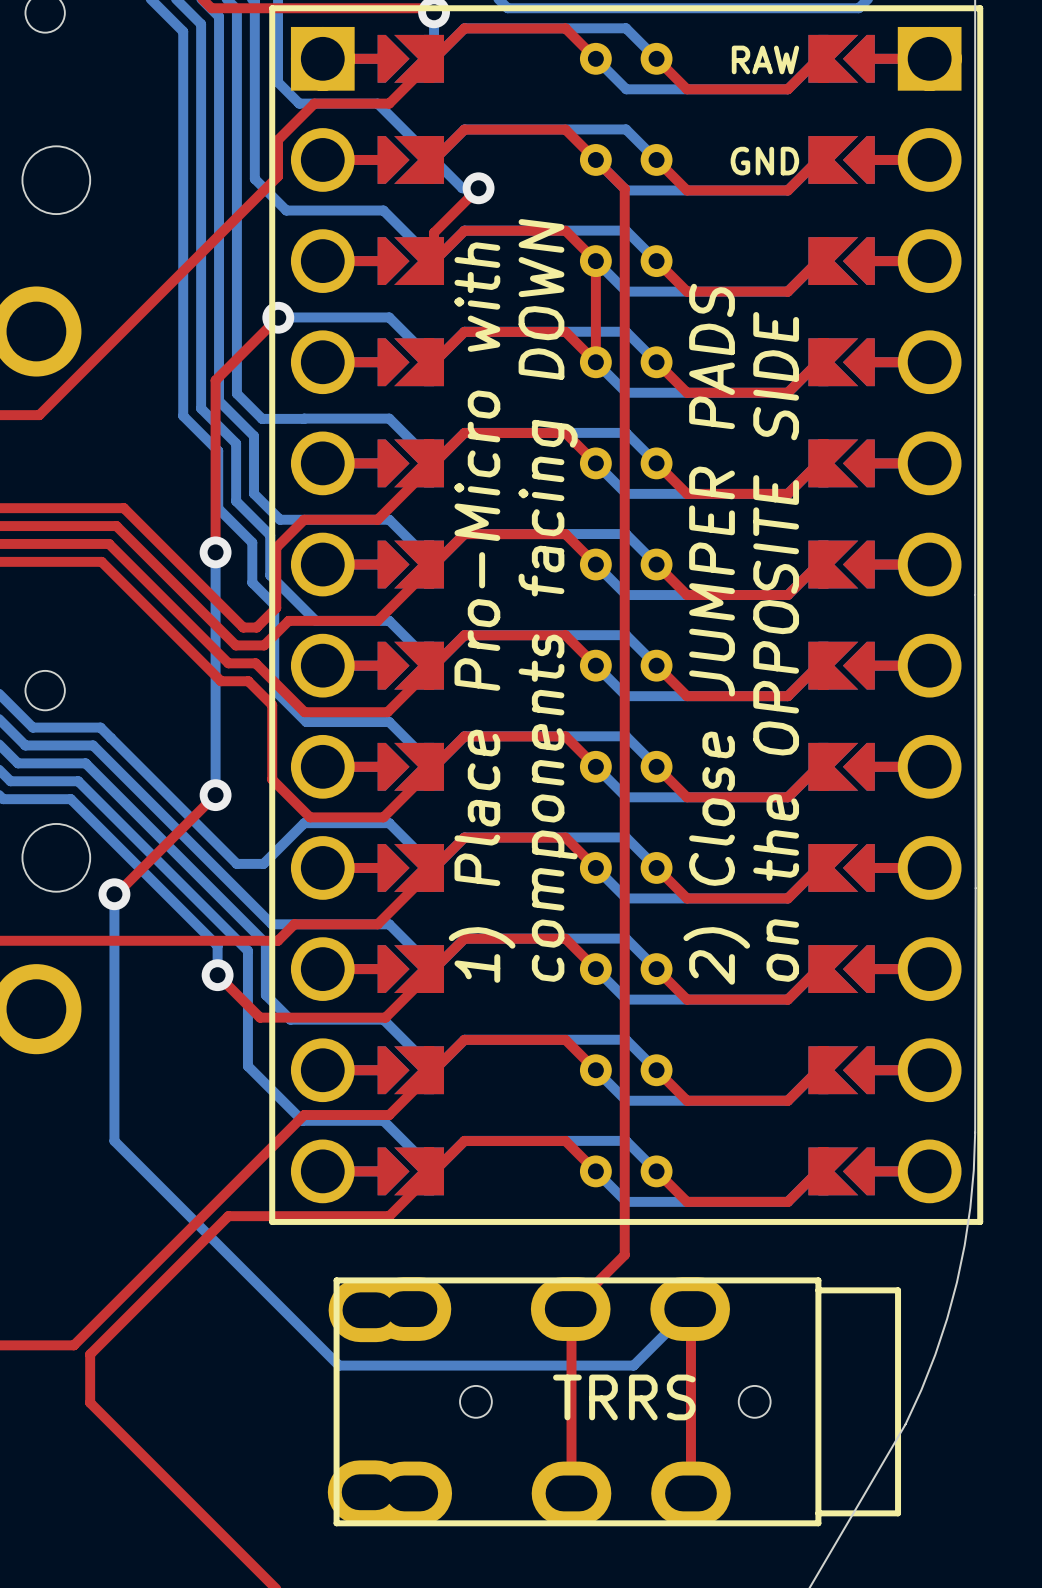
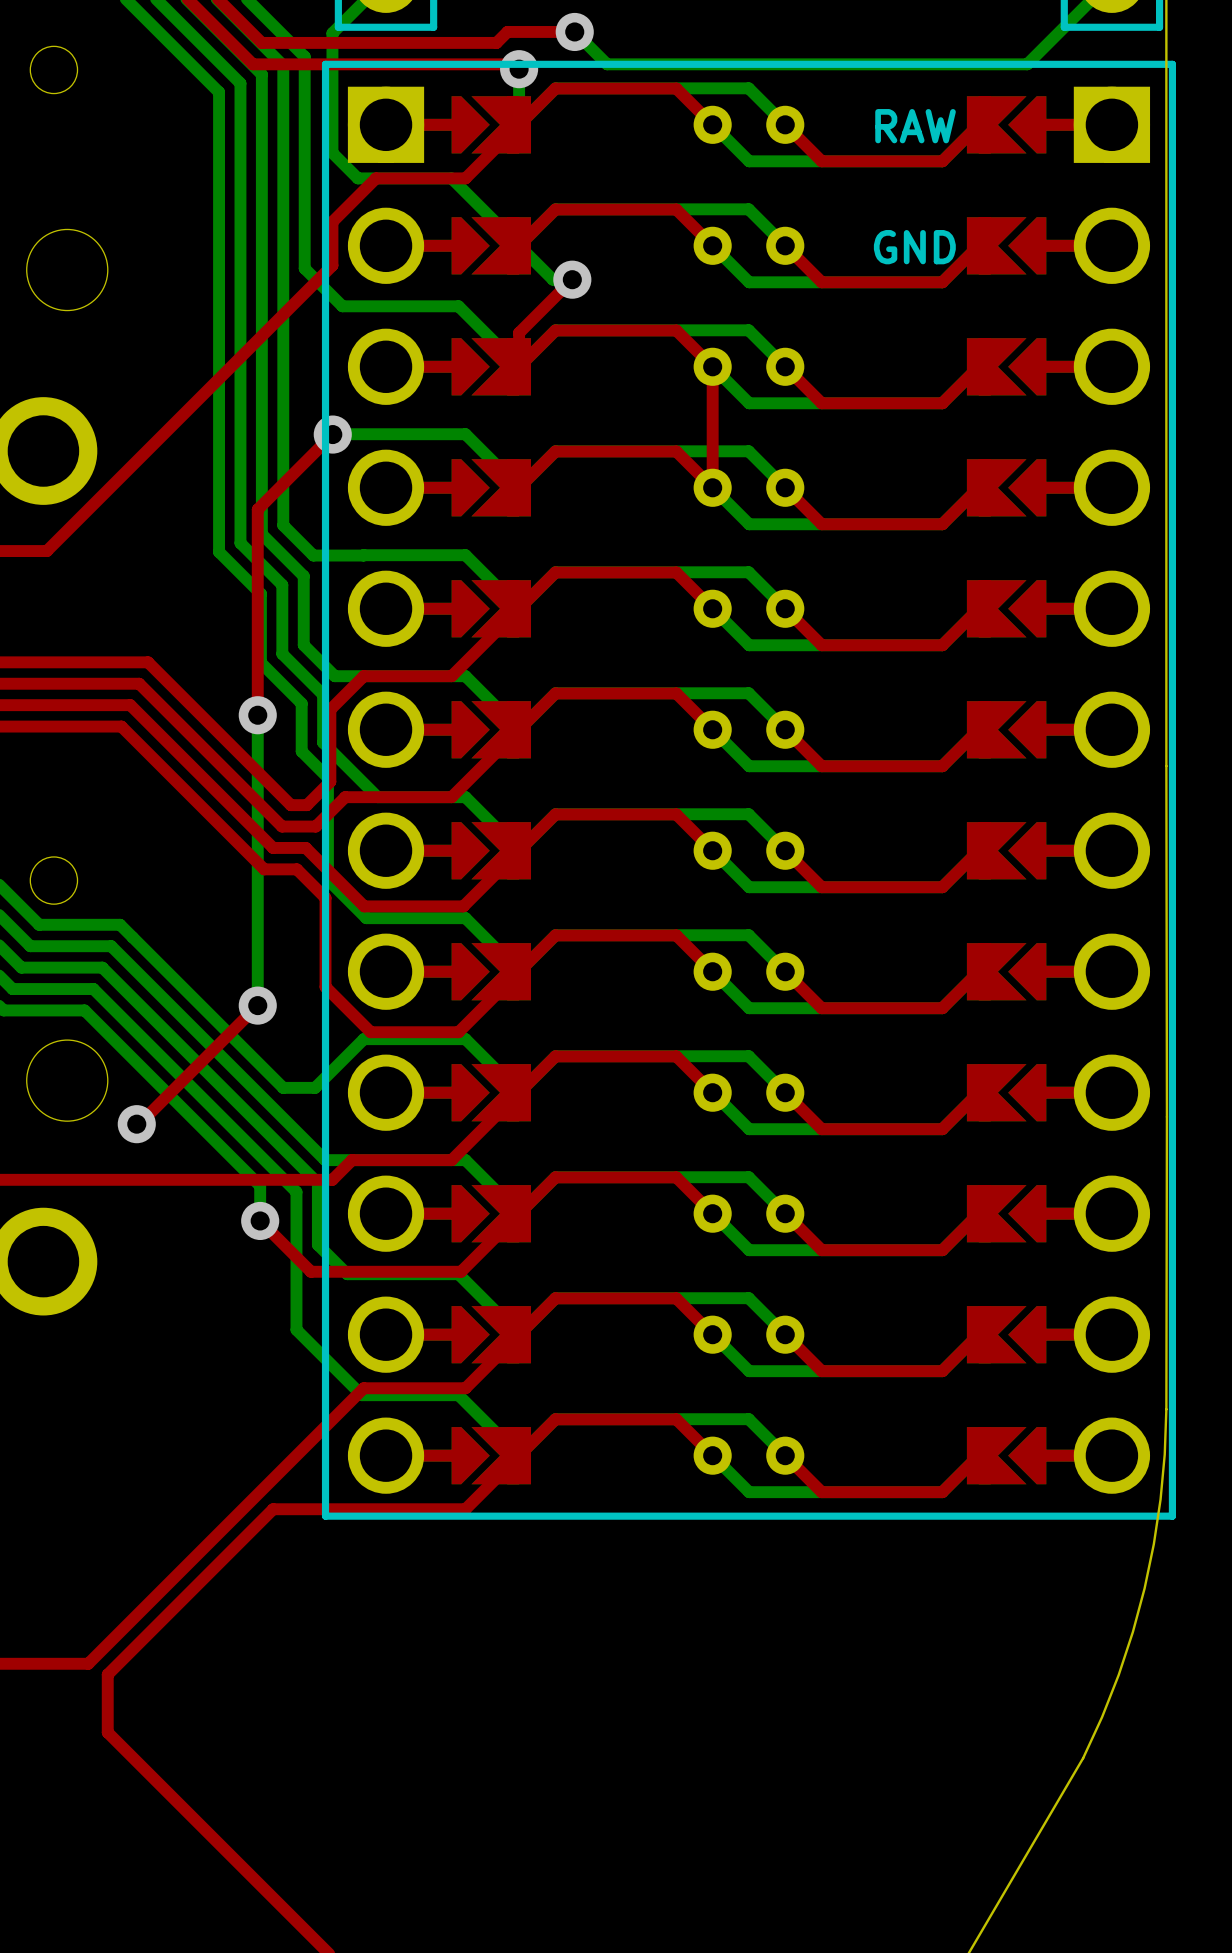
top track: (595, 159) (624, 188) (624, 1255) (570, 1309) (571, 1493) -> none
text: components facing DOWN (548, 600) -> none
text: 1) Place Pro-Micro with (482, 612) -> none
text: 2) Close JUMPER PADS (716, 634) -> none
text: on the OPPOSITE SIDE (776, 646) -> none
bottom track: (114, 894) (114, 1141) (338, 1365) (633, 1365) (690, 1309) -> none
top track: (690, 1309) (690, 1493) -> none
text: TRRS (624, 1397) -> none
part: (614, 1401) -> none

